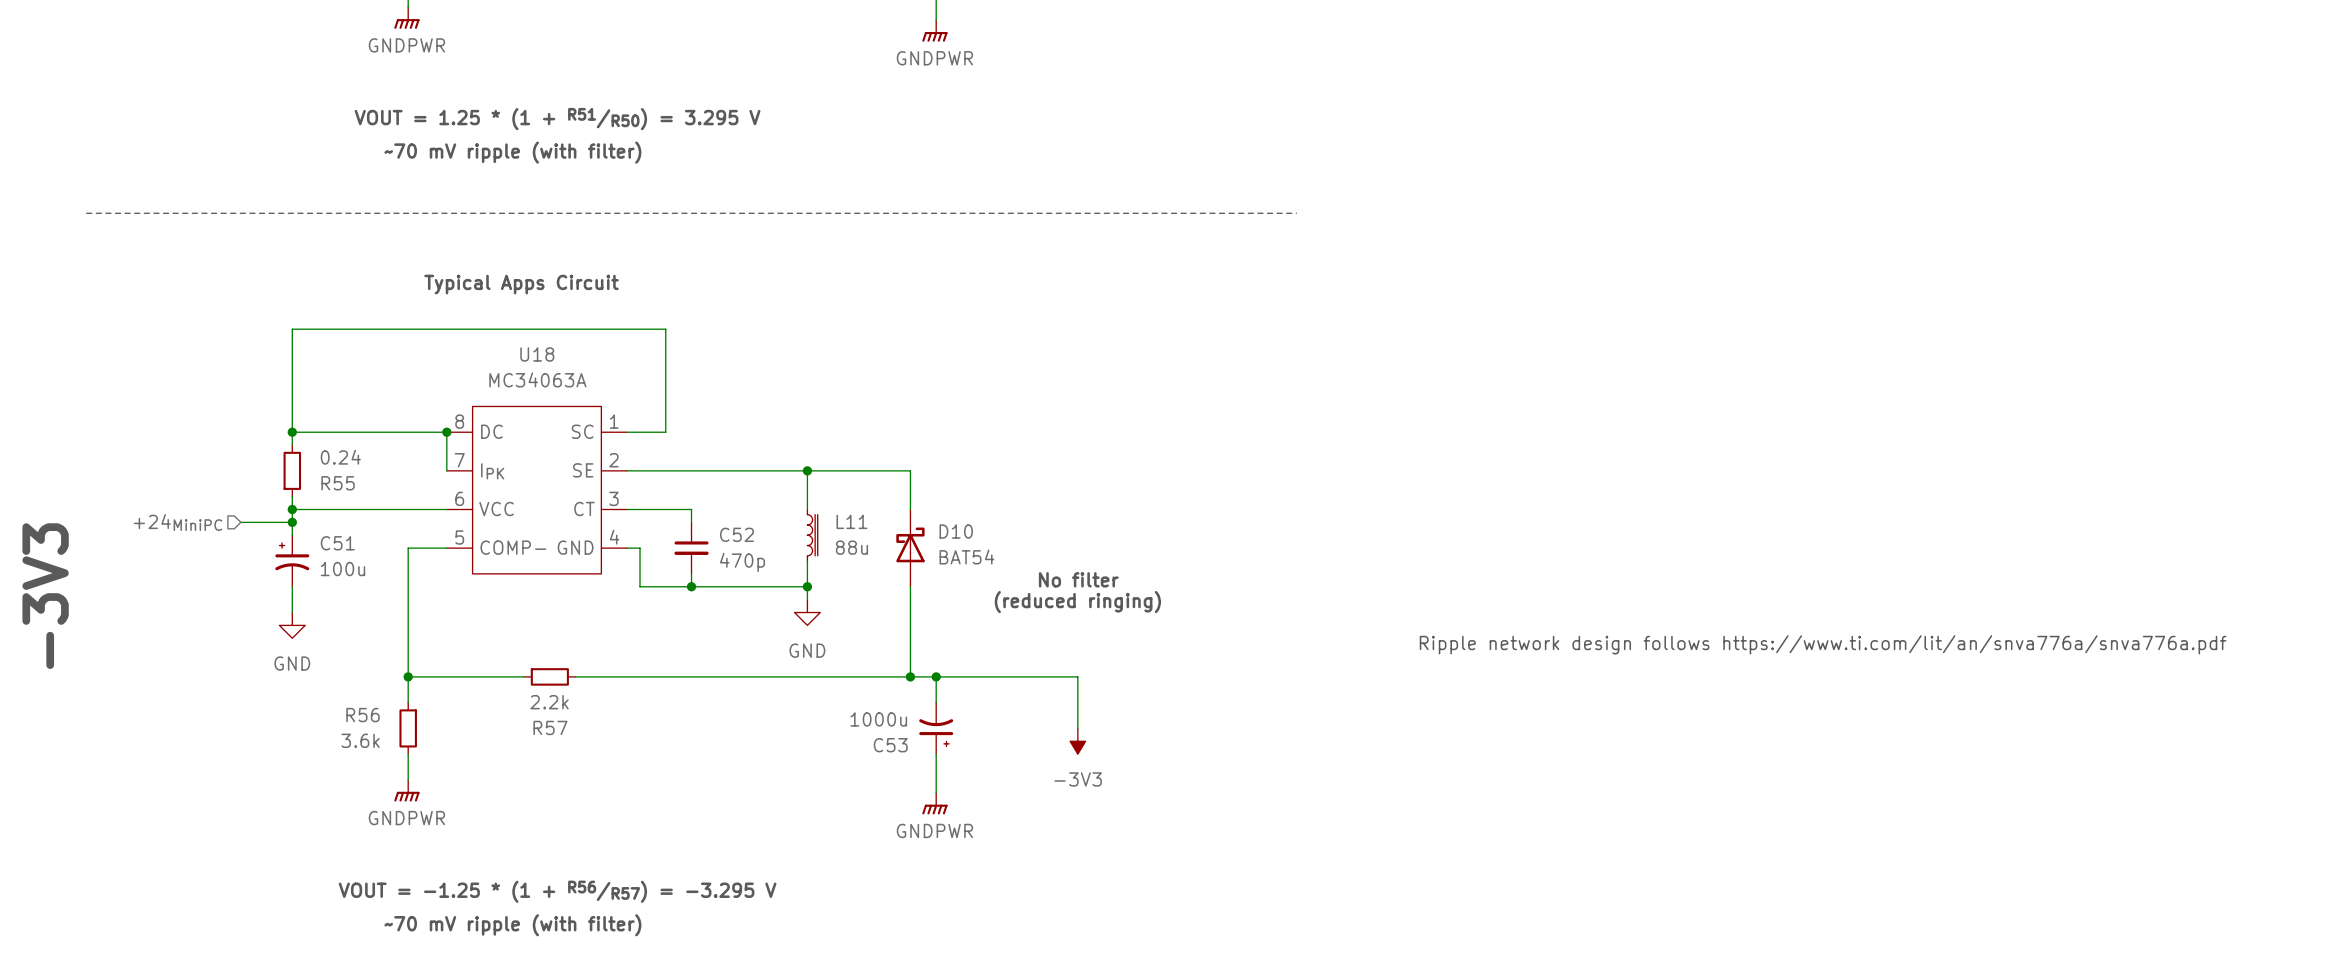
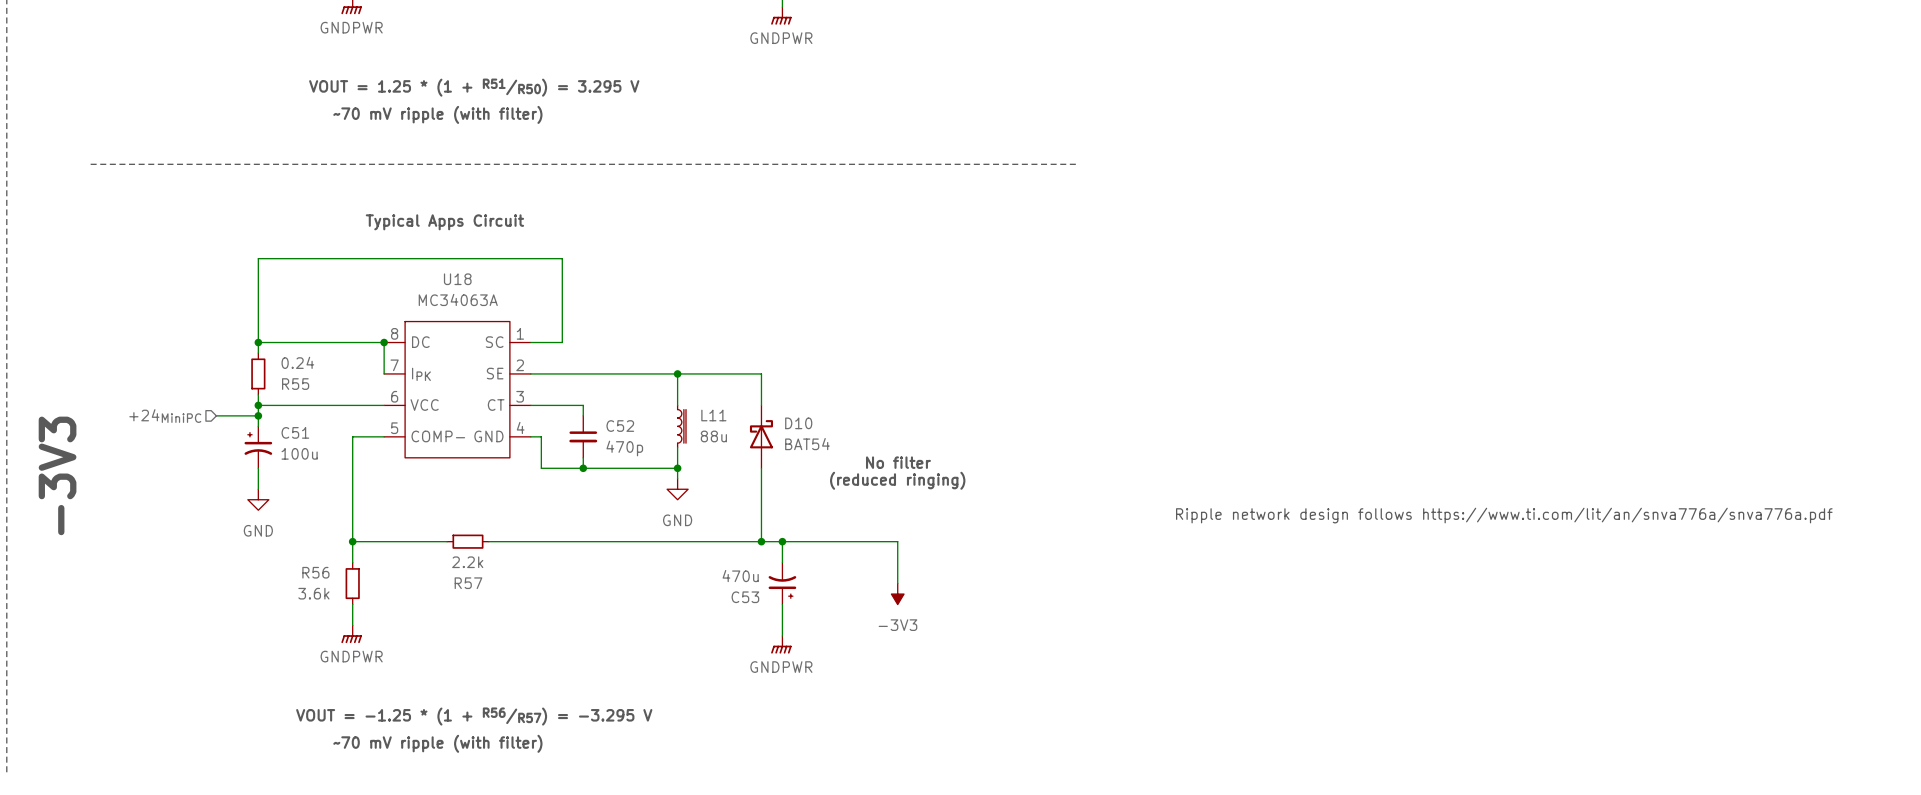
C53 value: 1000u (878, 719) -> 470u (740, 576)

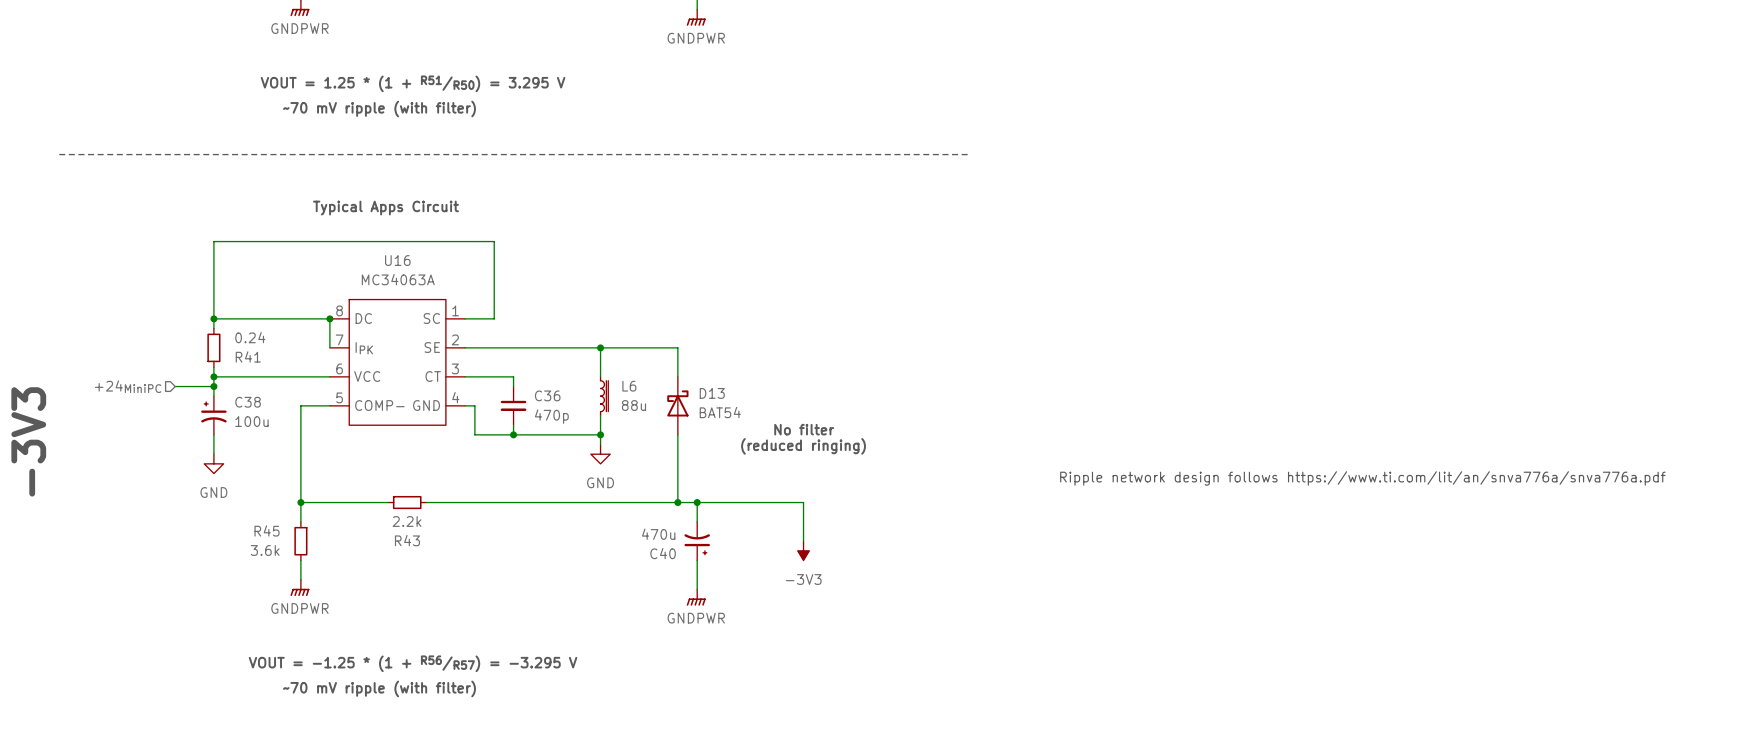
U18 name: U18 (457, 279) -> U16 (397, 260)
R55 name: R55 (295, 384) -> R41 (248, 356)
L11 name: L11 (713, 415) -> L6 (629, 386)
D10 name: D10 (798, 423) -> D13 (712, 393)
C52 name: C52 (620, 426) -> C36 (547, 395)
C51 name: C51 (295, 432) -> C38 (248, 402)
R56 name: R56 (315, 572) -> R45 (267, 530)
R57 name: R57 (468, 583) -> R43 (407, 540)
C53 name: C53 (745, 597) -> C40 (663, 553)

